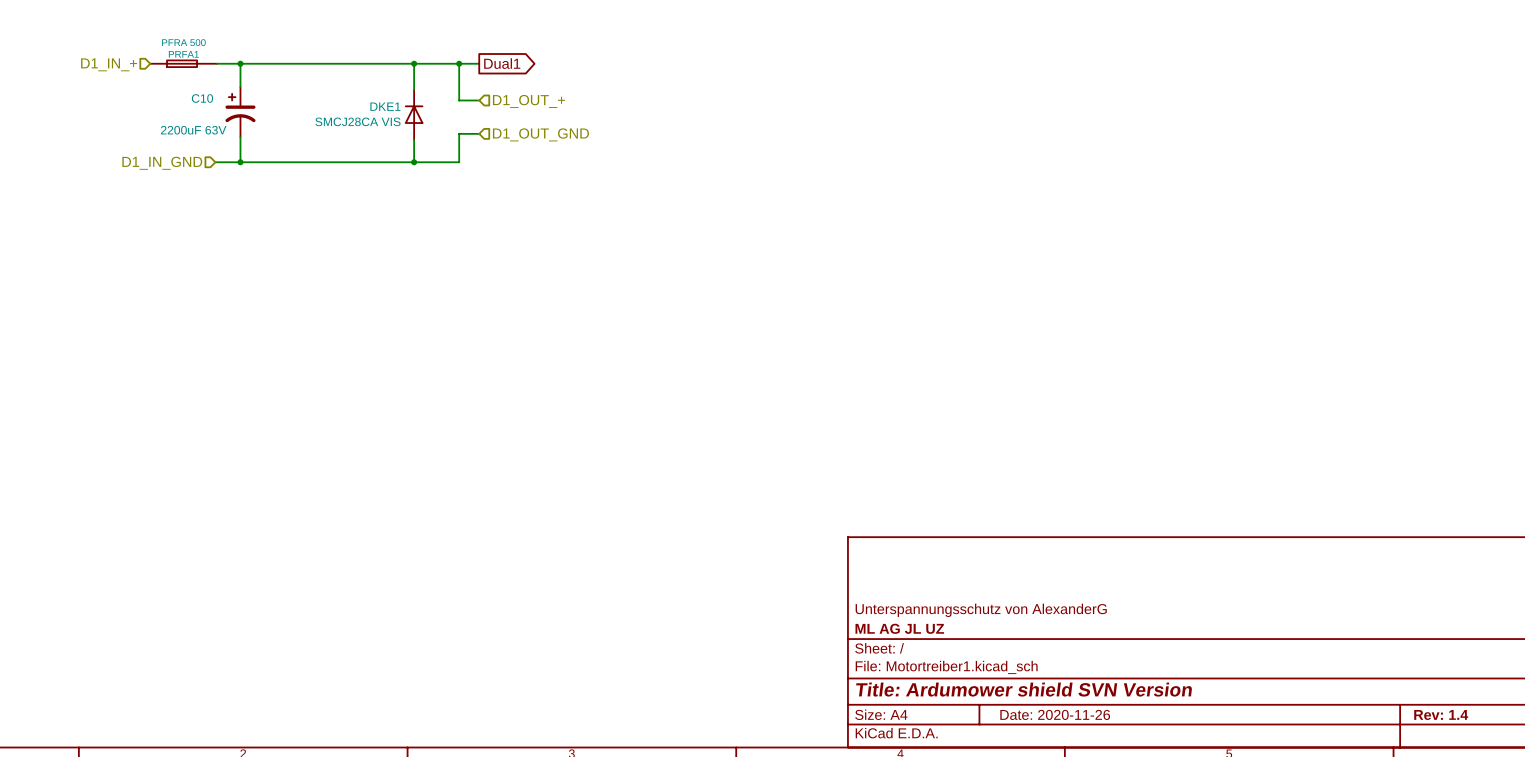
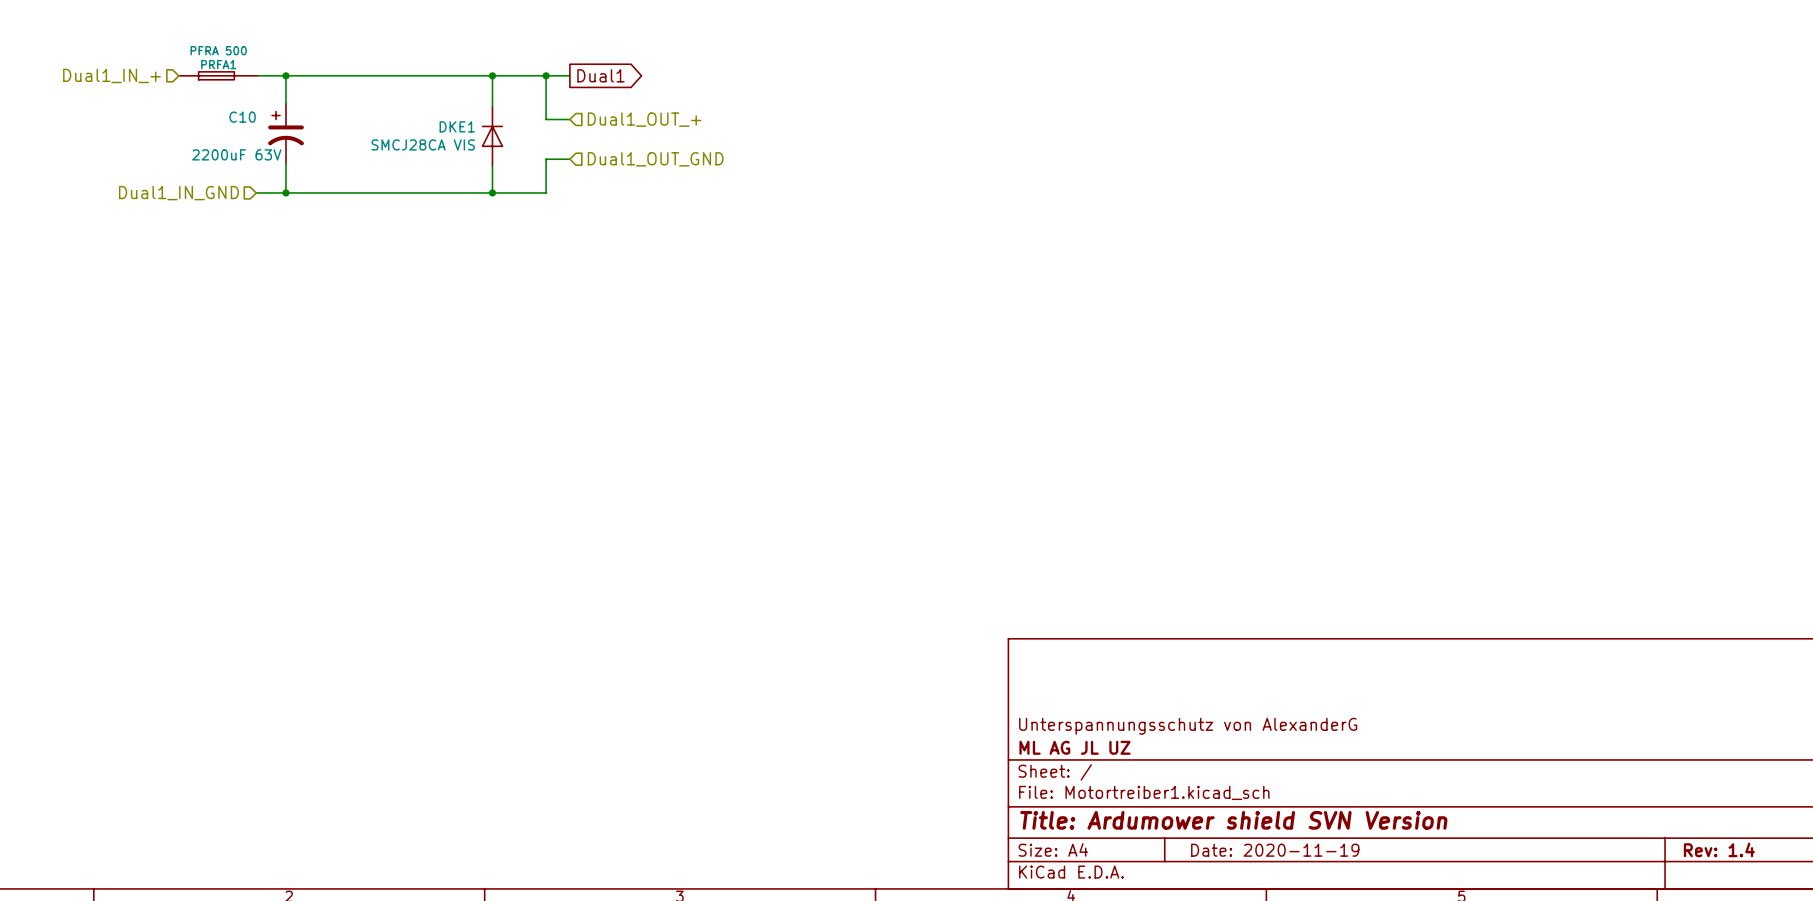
hierarchical label: D1_IN_+ (109, 64) -> Dual1_IN_+ (112, 75)
hierarchical label: D1_OUT_+ (529, 101) -> Dual1_OUT_+ (644, 119)
hierarchical label: D1_OUT_GND (540, 134) -> Dual1_OUT_GND (655, 159)
hierarchical label: D1_IN_GND (162, 163) -> Dual1_IN_GND (178, 193)
title block: Date: 2020-11-26 (1055, 714) -> Date: 2020-11-19 (1275, 850)

